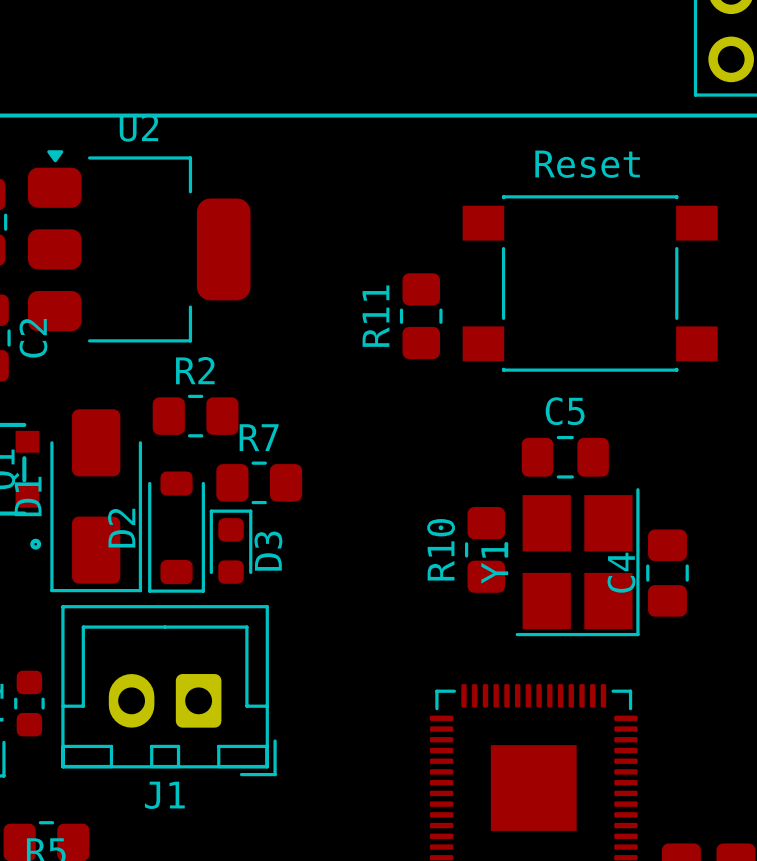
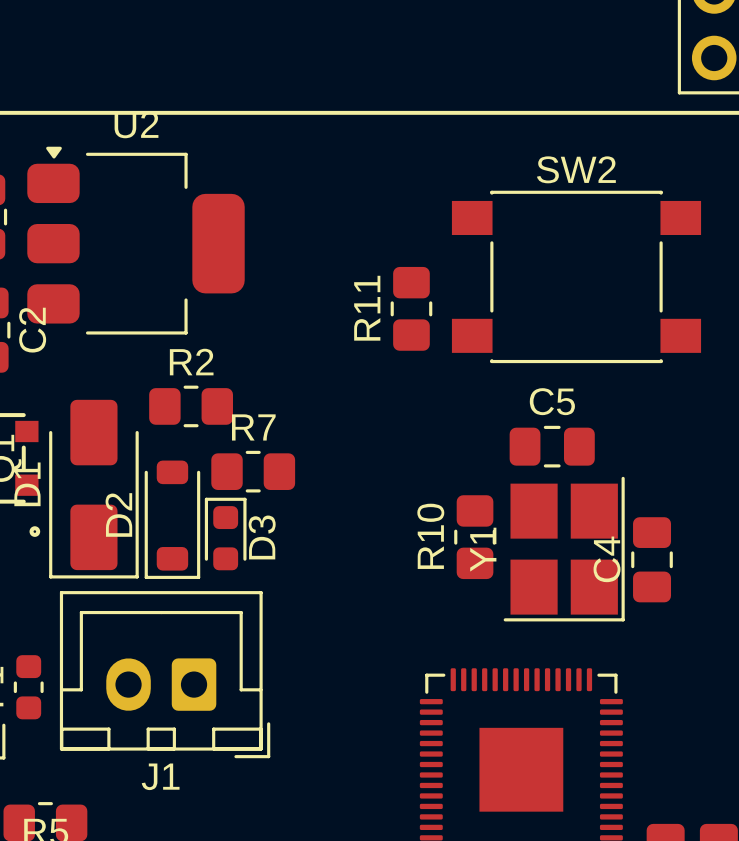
SW2 value: Reset (587, 164) -> none
SW2 name: none -> SW2 (576, 169)

